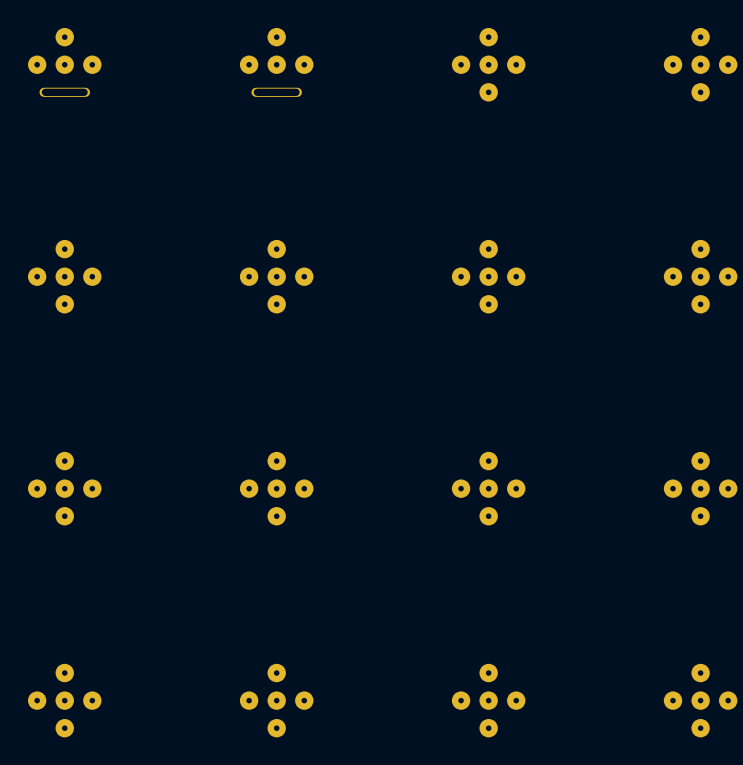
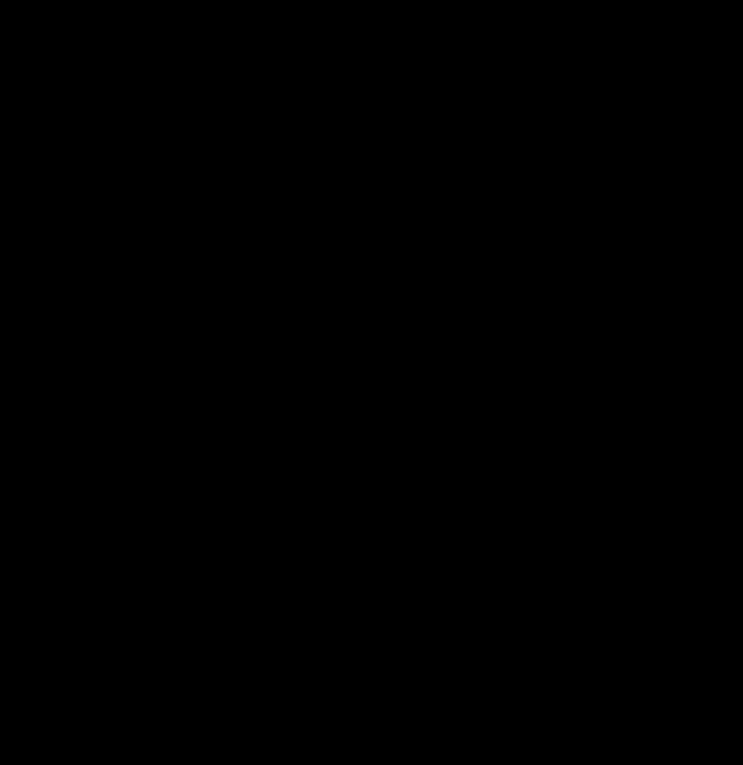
part: (64, 62) -> none
part: (276, 62) -> none
part: (488, 64) -> none
part: (700, 64) -> none
part: (64, 276) -> none
part: (276, 276) -> none
part: (488, 276) -> none
part: (700, 276) -> none
part: (64, 488) -> none
part: (276, 488) -> none
part: (488, 488) -> none
part: (700, 488) -> none
part: (64, 700) -> none
part: (276, 700) -> none
part: (488, 700) -> none
part: (700, 700) -> none

